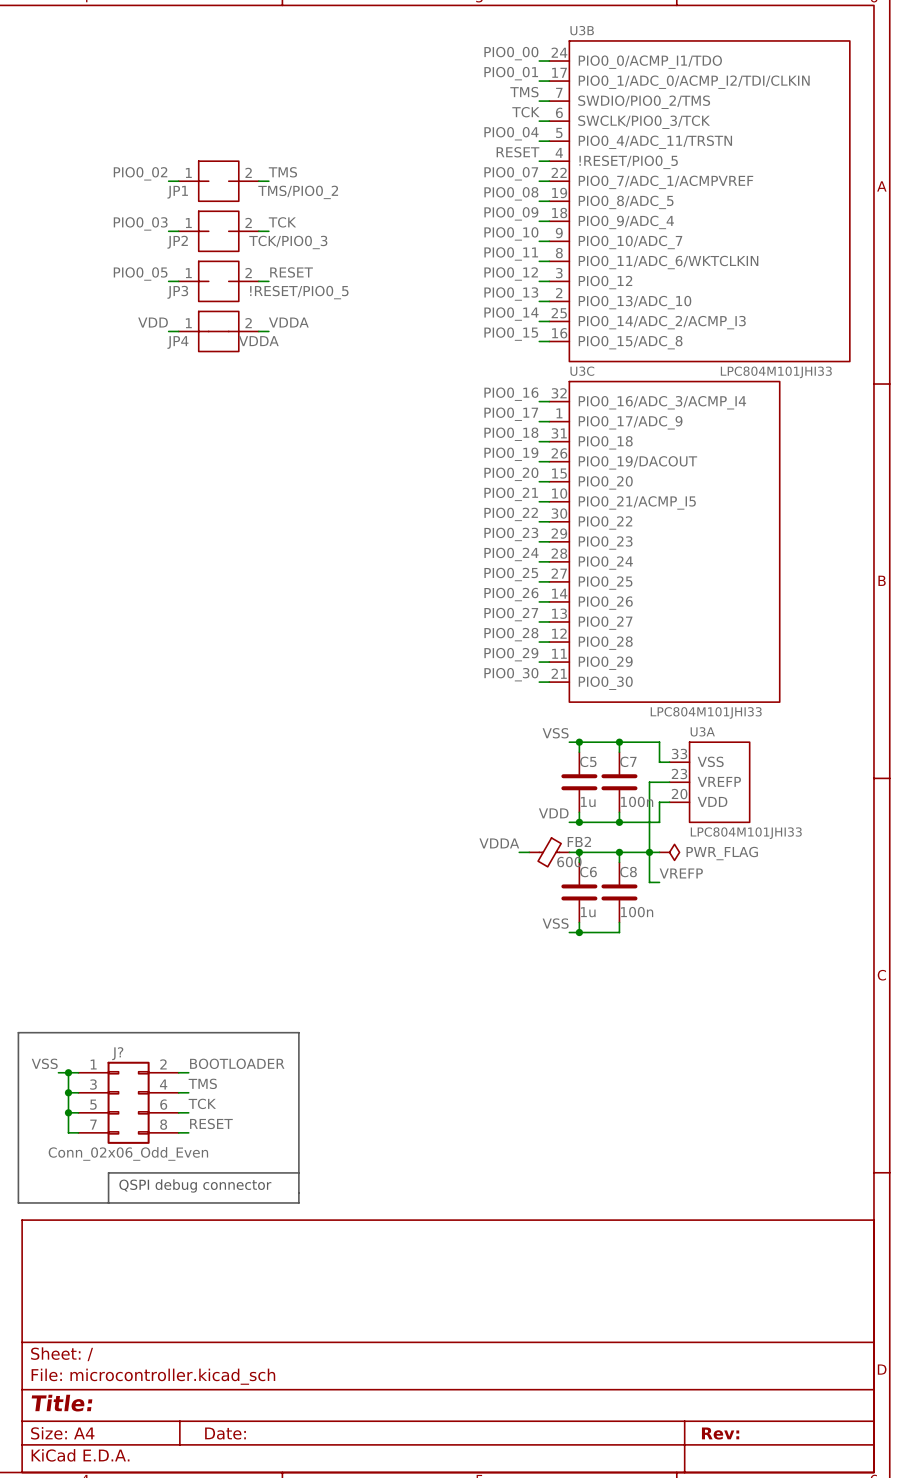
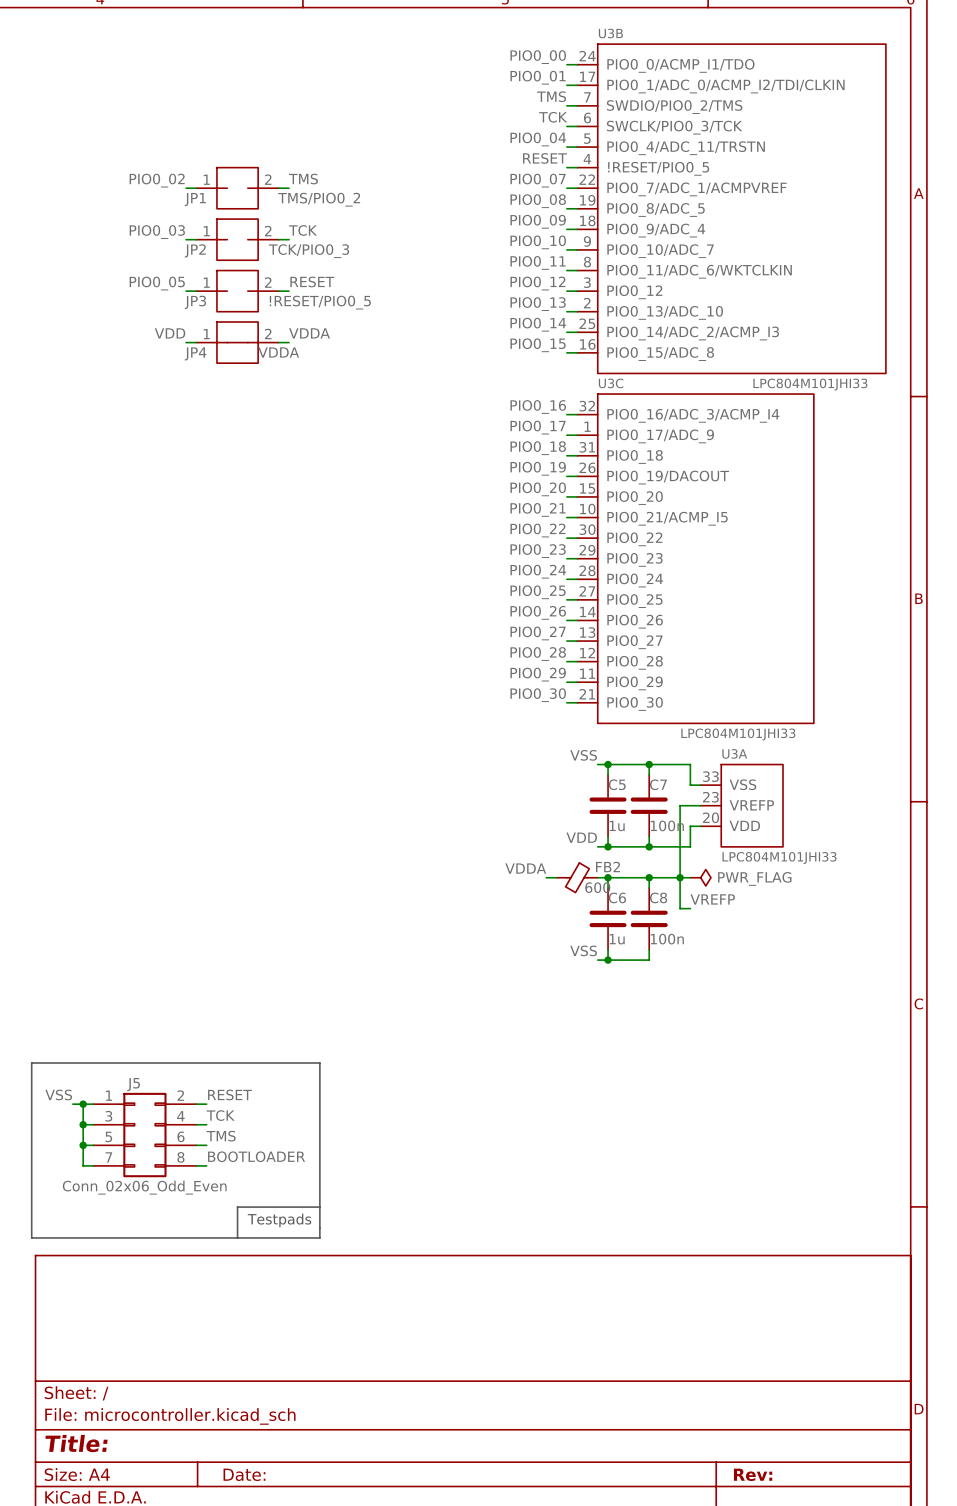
J? name: J? (117, 1053) -> J5 (133, 1084)
label: BOOTLOADER (237, 1063) -> RESET (229, 1094)
label: TMS (202, 1083) -> TCK (220, 1115)
label: TCK (202, 1103) -> TMS (221, 1136)
label: RESET (211, 1123) -> BOOTLOADER (256, 1156)
line: (218, 1172) (108, 1172) (108, 1202) -> (237, 1207) (237, 1237)
text: QSPI debug connector (195, 1185) -> none
text: none -> Testpads (279, 1220)

